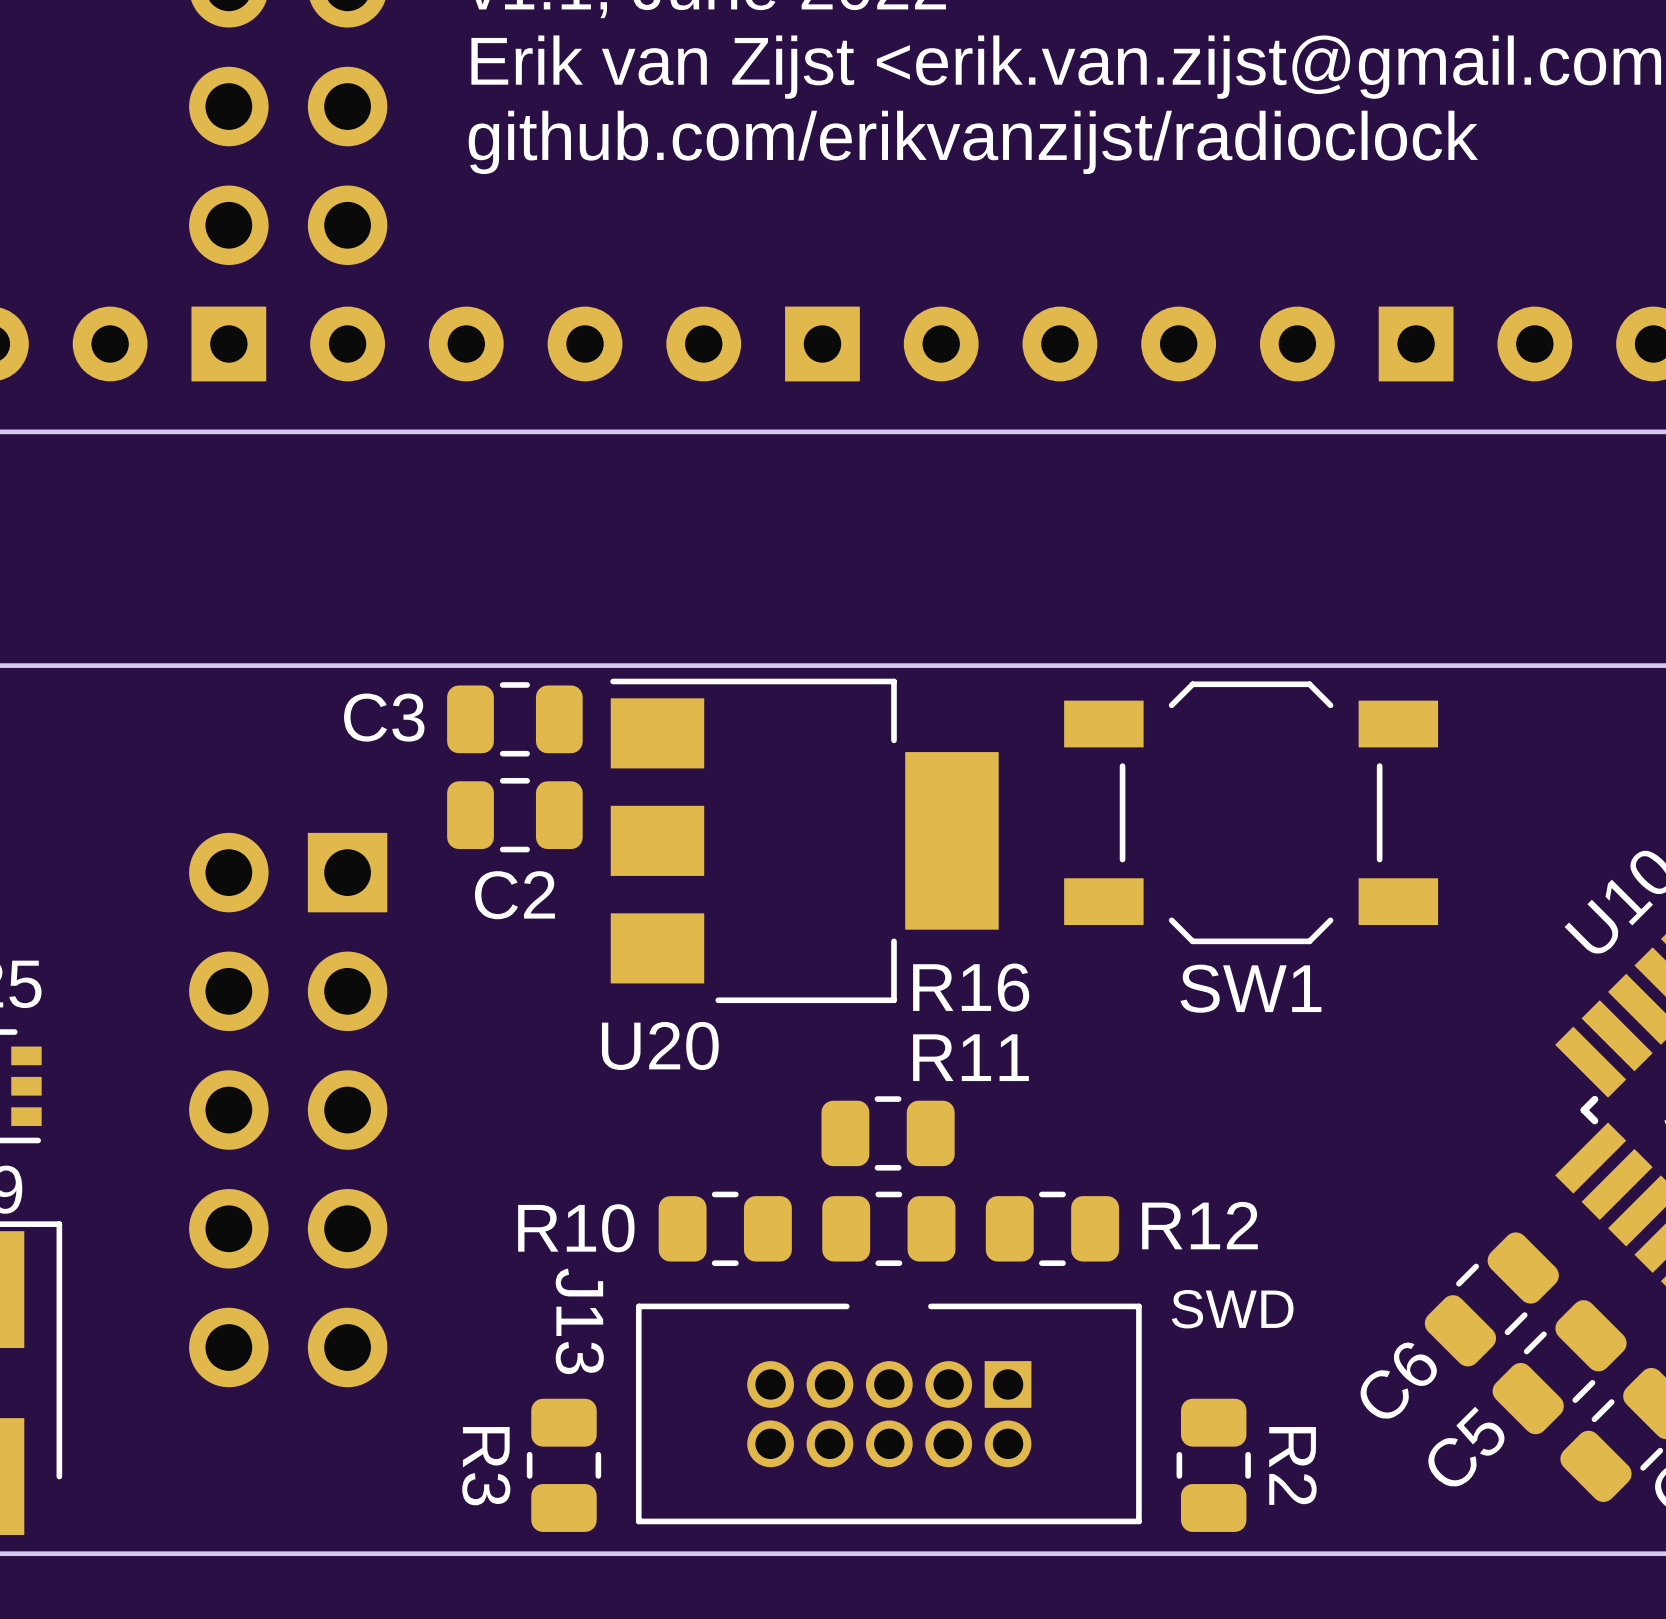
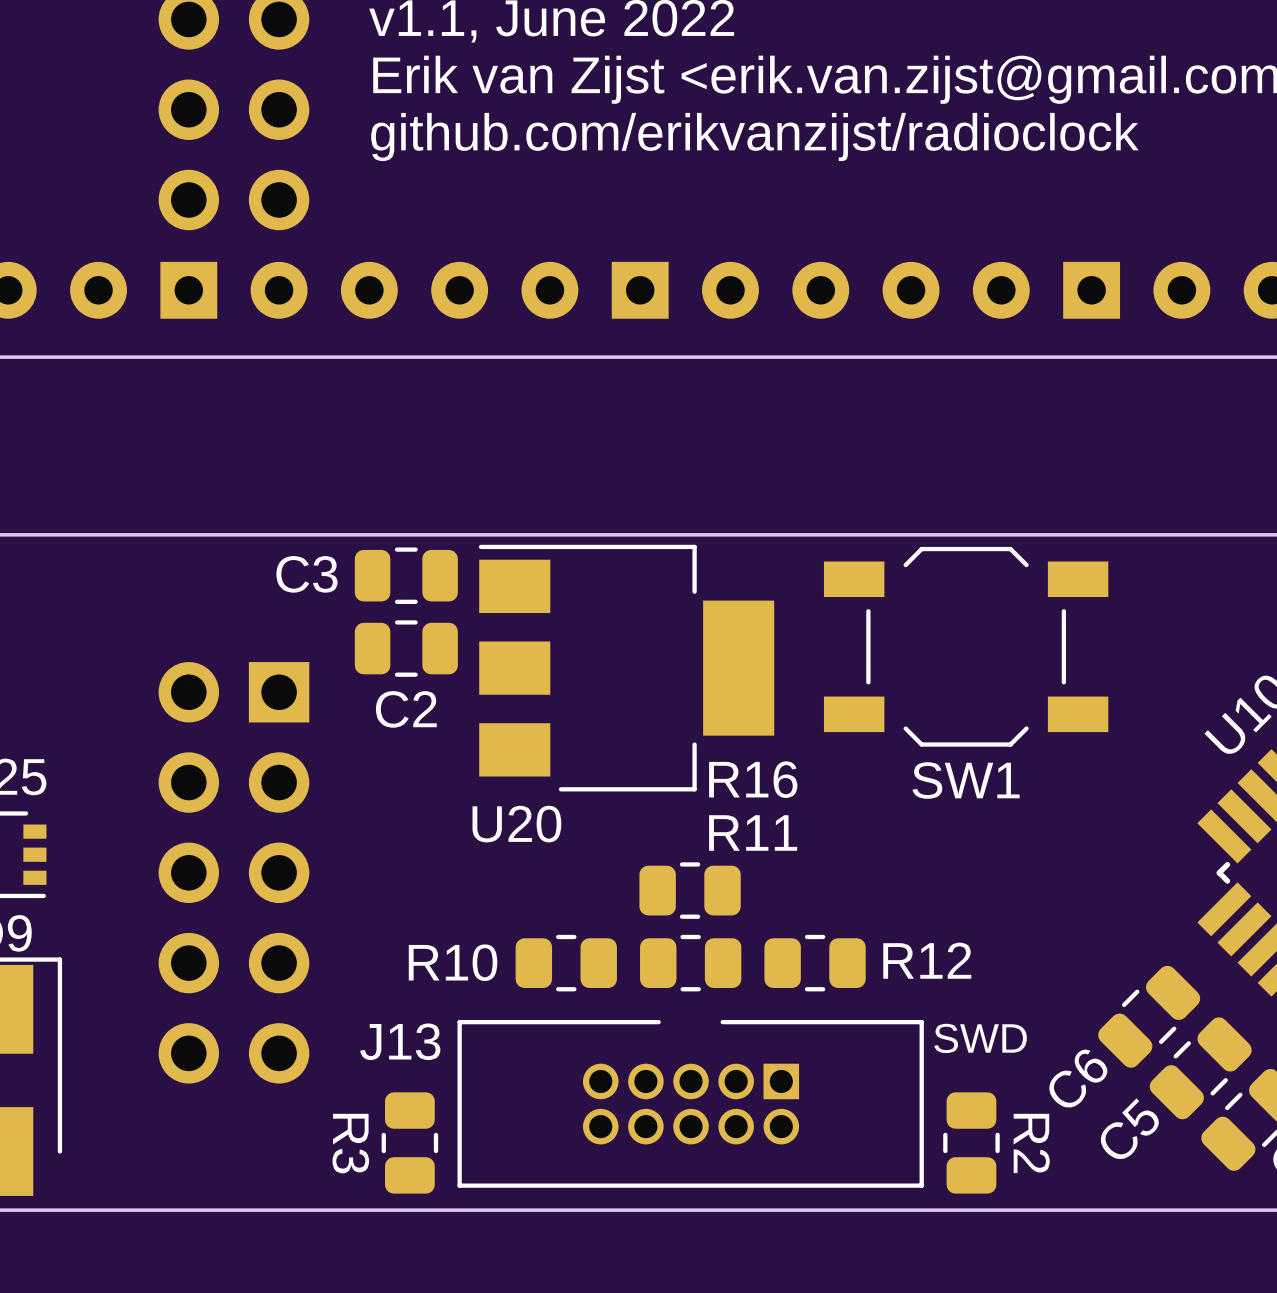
J13 footprint: [635, 1303, 1142, 1525] -> [457, 1019, 924, 1188]
R3 position: (563, 1465) -> (409, 1142)
R2 position: (1213, 1465) -> (971, 1142)

